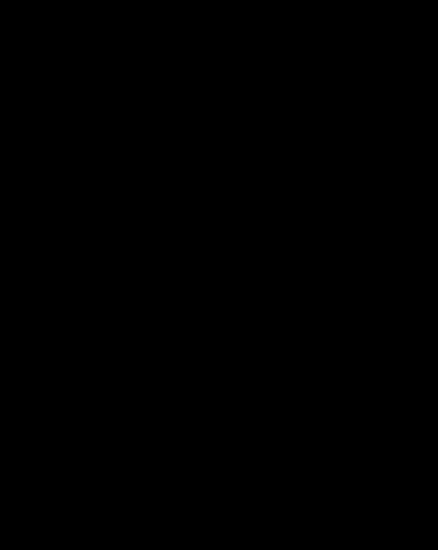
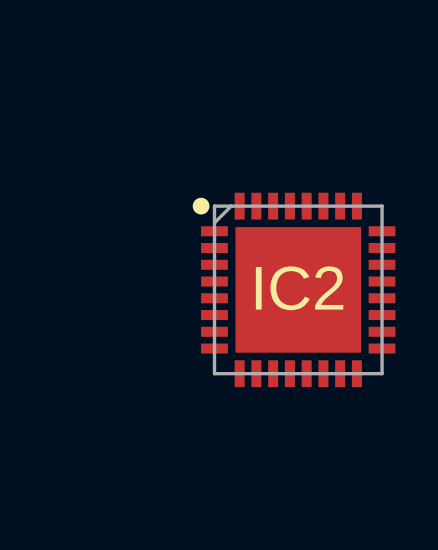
IC2: none -> (294, 289)

